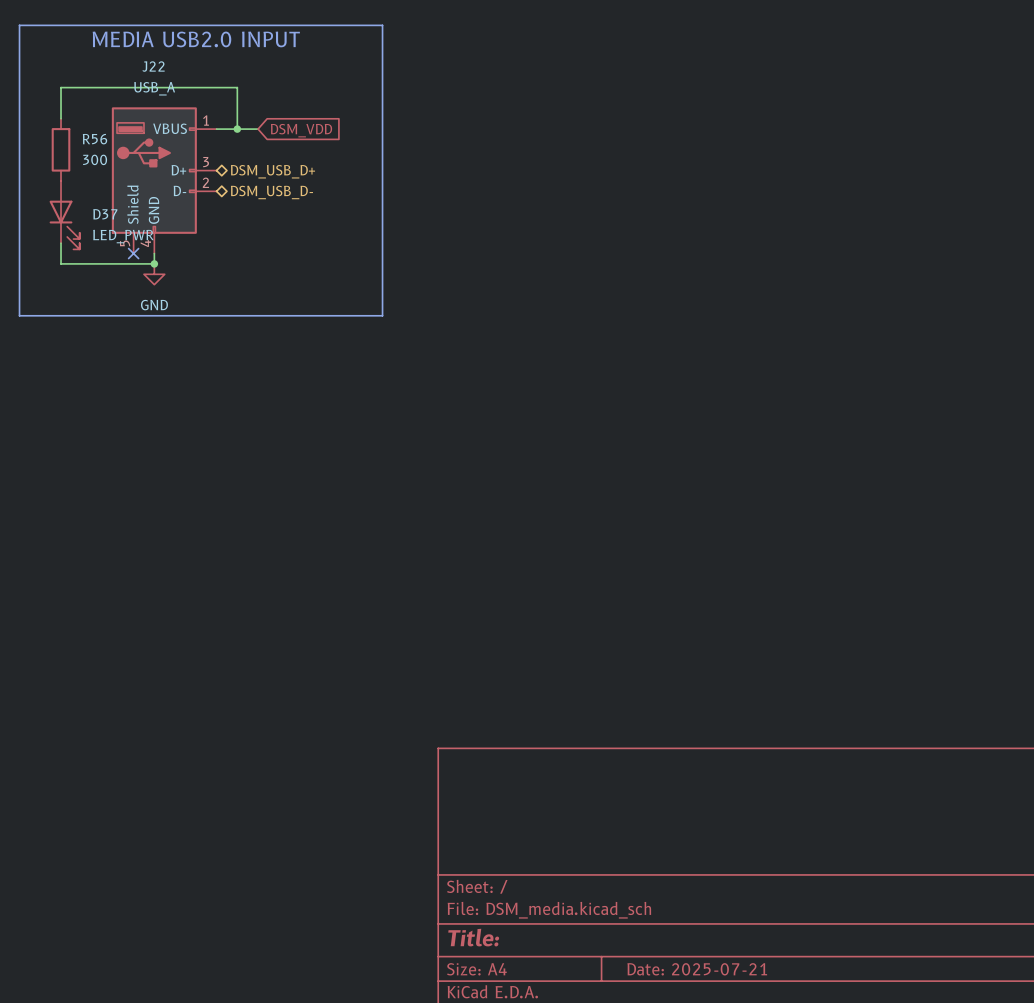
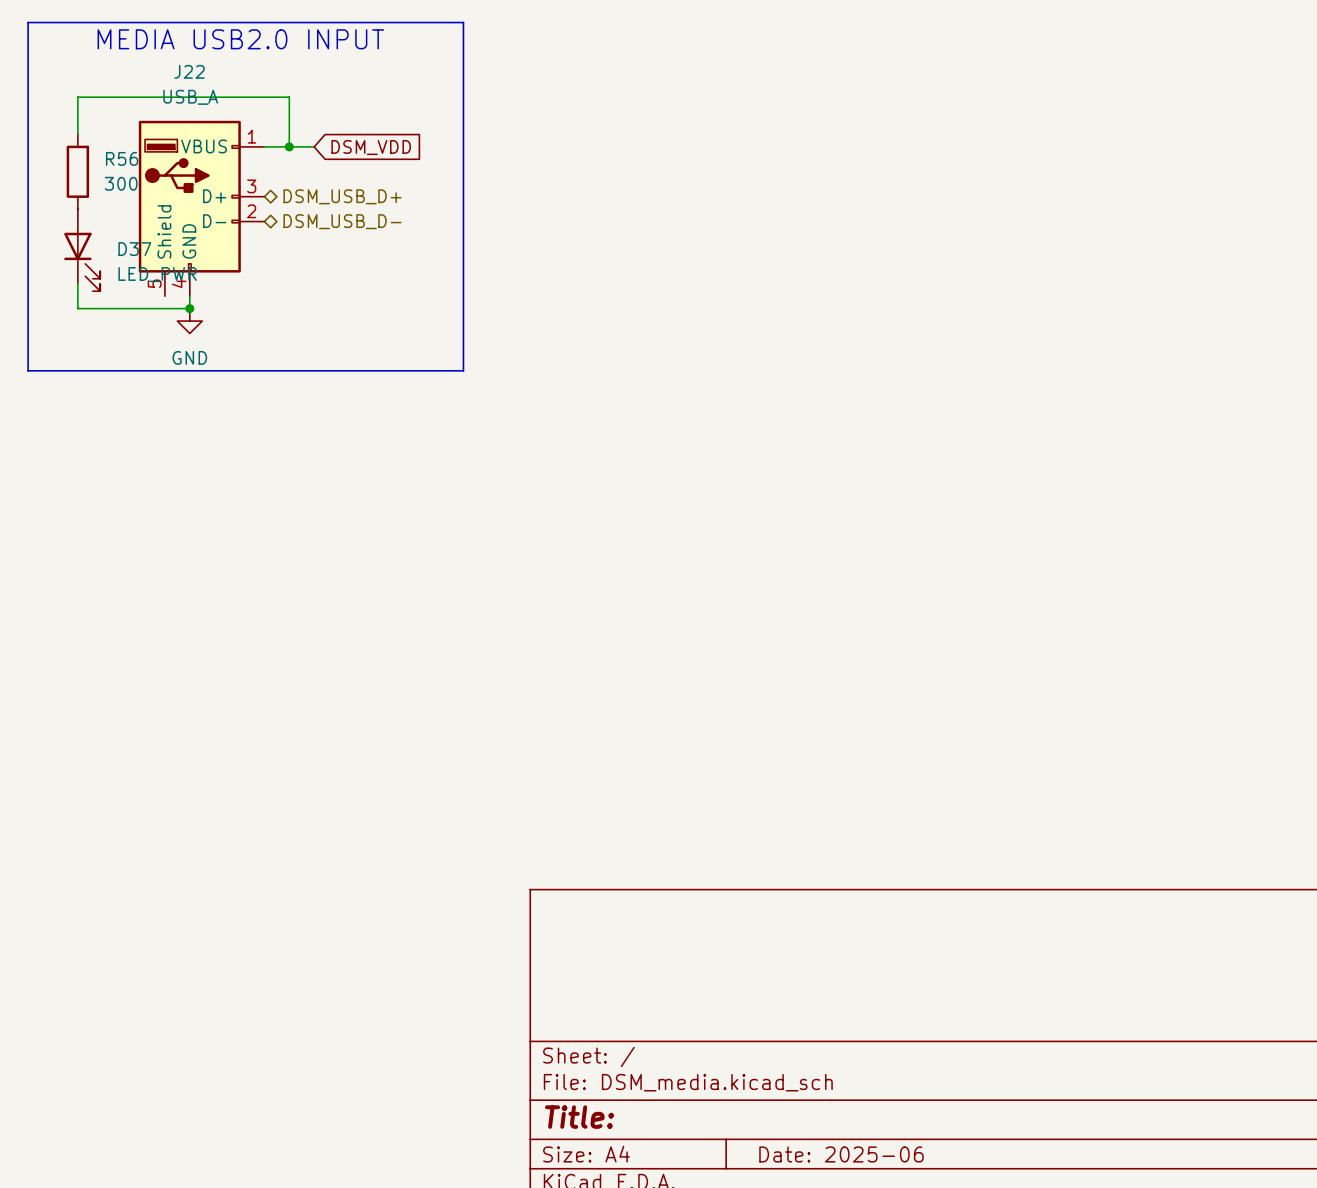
no-connect mark: (133, 253) -> none
title block: Date: 2025-07-21 (697, 969) -> Date: 2025-06 (841, 1154)

